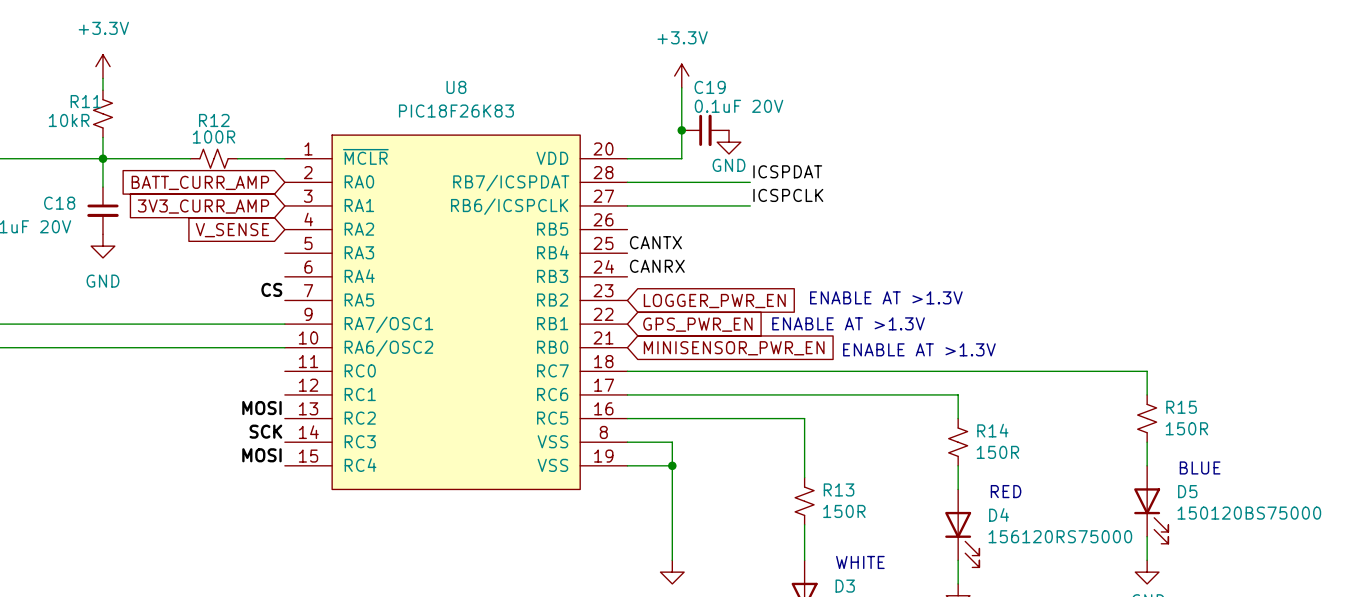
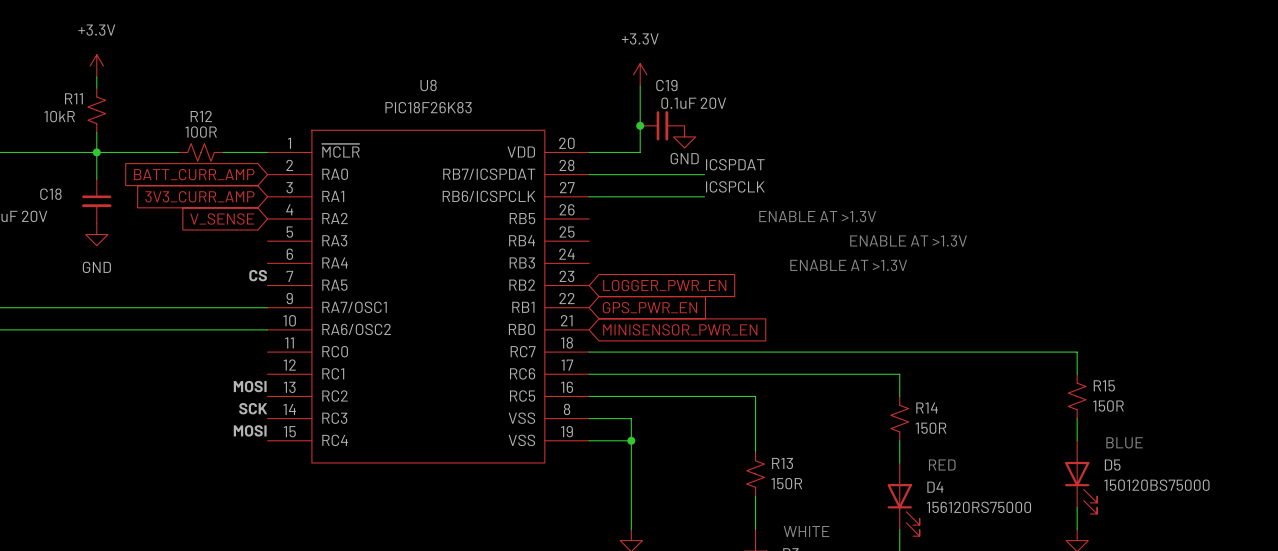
text: none -> ENABLE AT >1.3V (817, 216)
label: CANTX (655, 242) -> none
text: none -> ENABLE AT >1.3V (908, 241)
label: CANRX (657, 266) -> none
text position: ENABLE AT >1.3V (886, 297) -> ENABLE AT >1.3V (848, 265)
text: ENABLE AT >1.3V (848, 323) -> none
text: ENABLE AT >1.3V (919, 349) -> none

